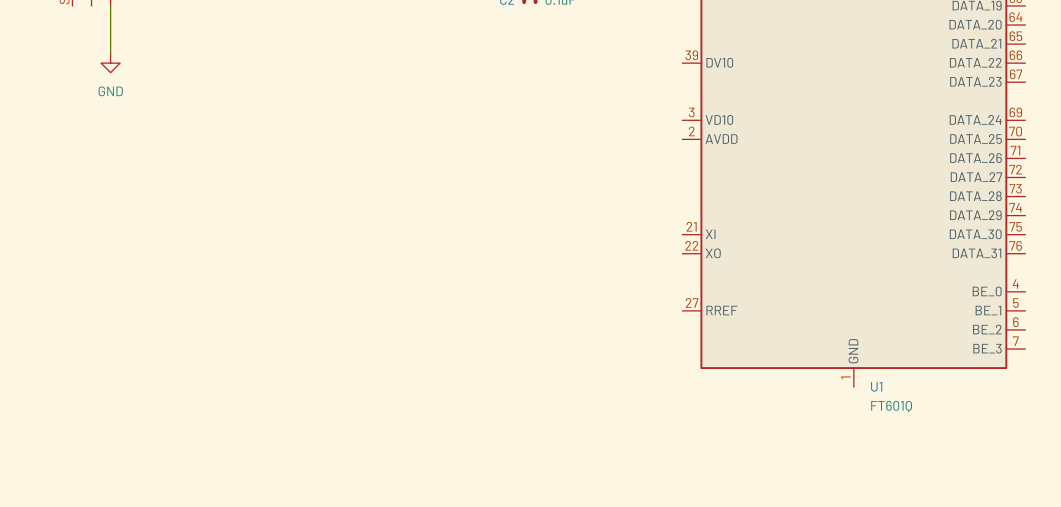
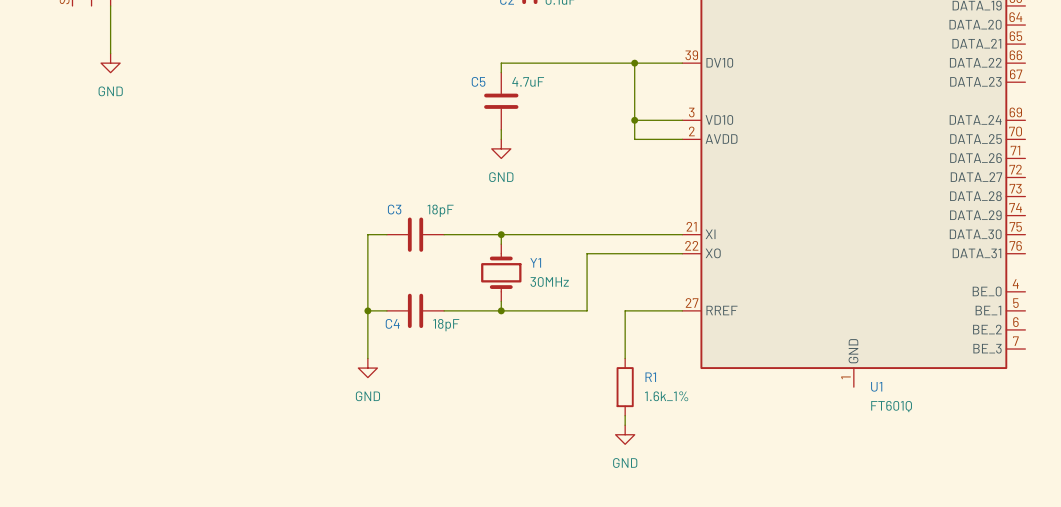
wire: none -> (634, 63) (634, 139) (682, 139)
junction: none -> (634, 63)
wire: none -> (682, 63) (501, 63) (501, 72)
C5: none -> 4.7uF (501, 101)
wire: none -> (634, 120) (682, 120)
junction: none -> (634, 120)
wire: none -> (501, 129) (501, 139)
power symbol: none -> GND (501, 148)
wire: none -> (386, 234) (367, 234) (367, 358)
C3: none -> 18pF (415, 234)
wire: none -> (444, 234) (682, 234)
wire: none -> (501, 234) (501, 244)
junction: none -> (501, 234)
wire: none -> (682, 253) (587, 253) (587, 310) (444, 310)
Y1: none -> 30MHz (501, 272)
wire: none -> (501, 301) (501, 310)
wire: none -> (367, 310) (386, 310)
junction: none -> (367, 310)
C4: none -> 18pF (415, 310)
junction: none -> (501, 310)
wire: none -> (682, 310) (625, 310) (625, 358)
power symbol: none -> GND (367, 368)
R1: none -> 1.6k_1% (625, 387)
wire: none -> (625, 415) (625, 425)
power symbol: none -> GND (625, 434)

